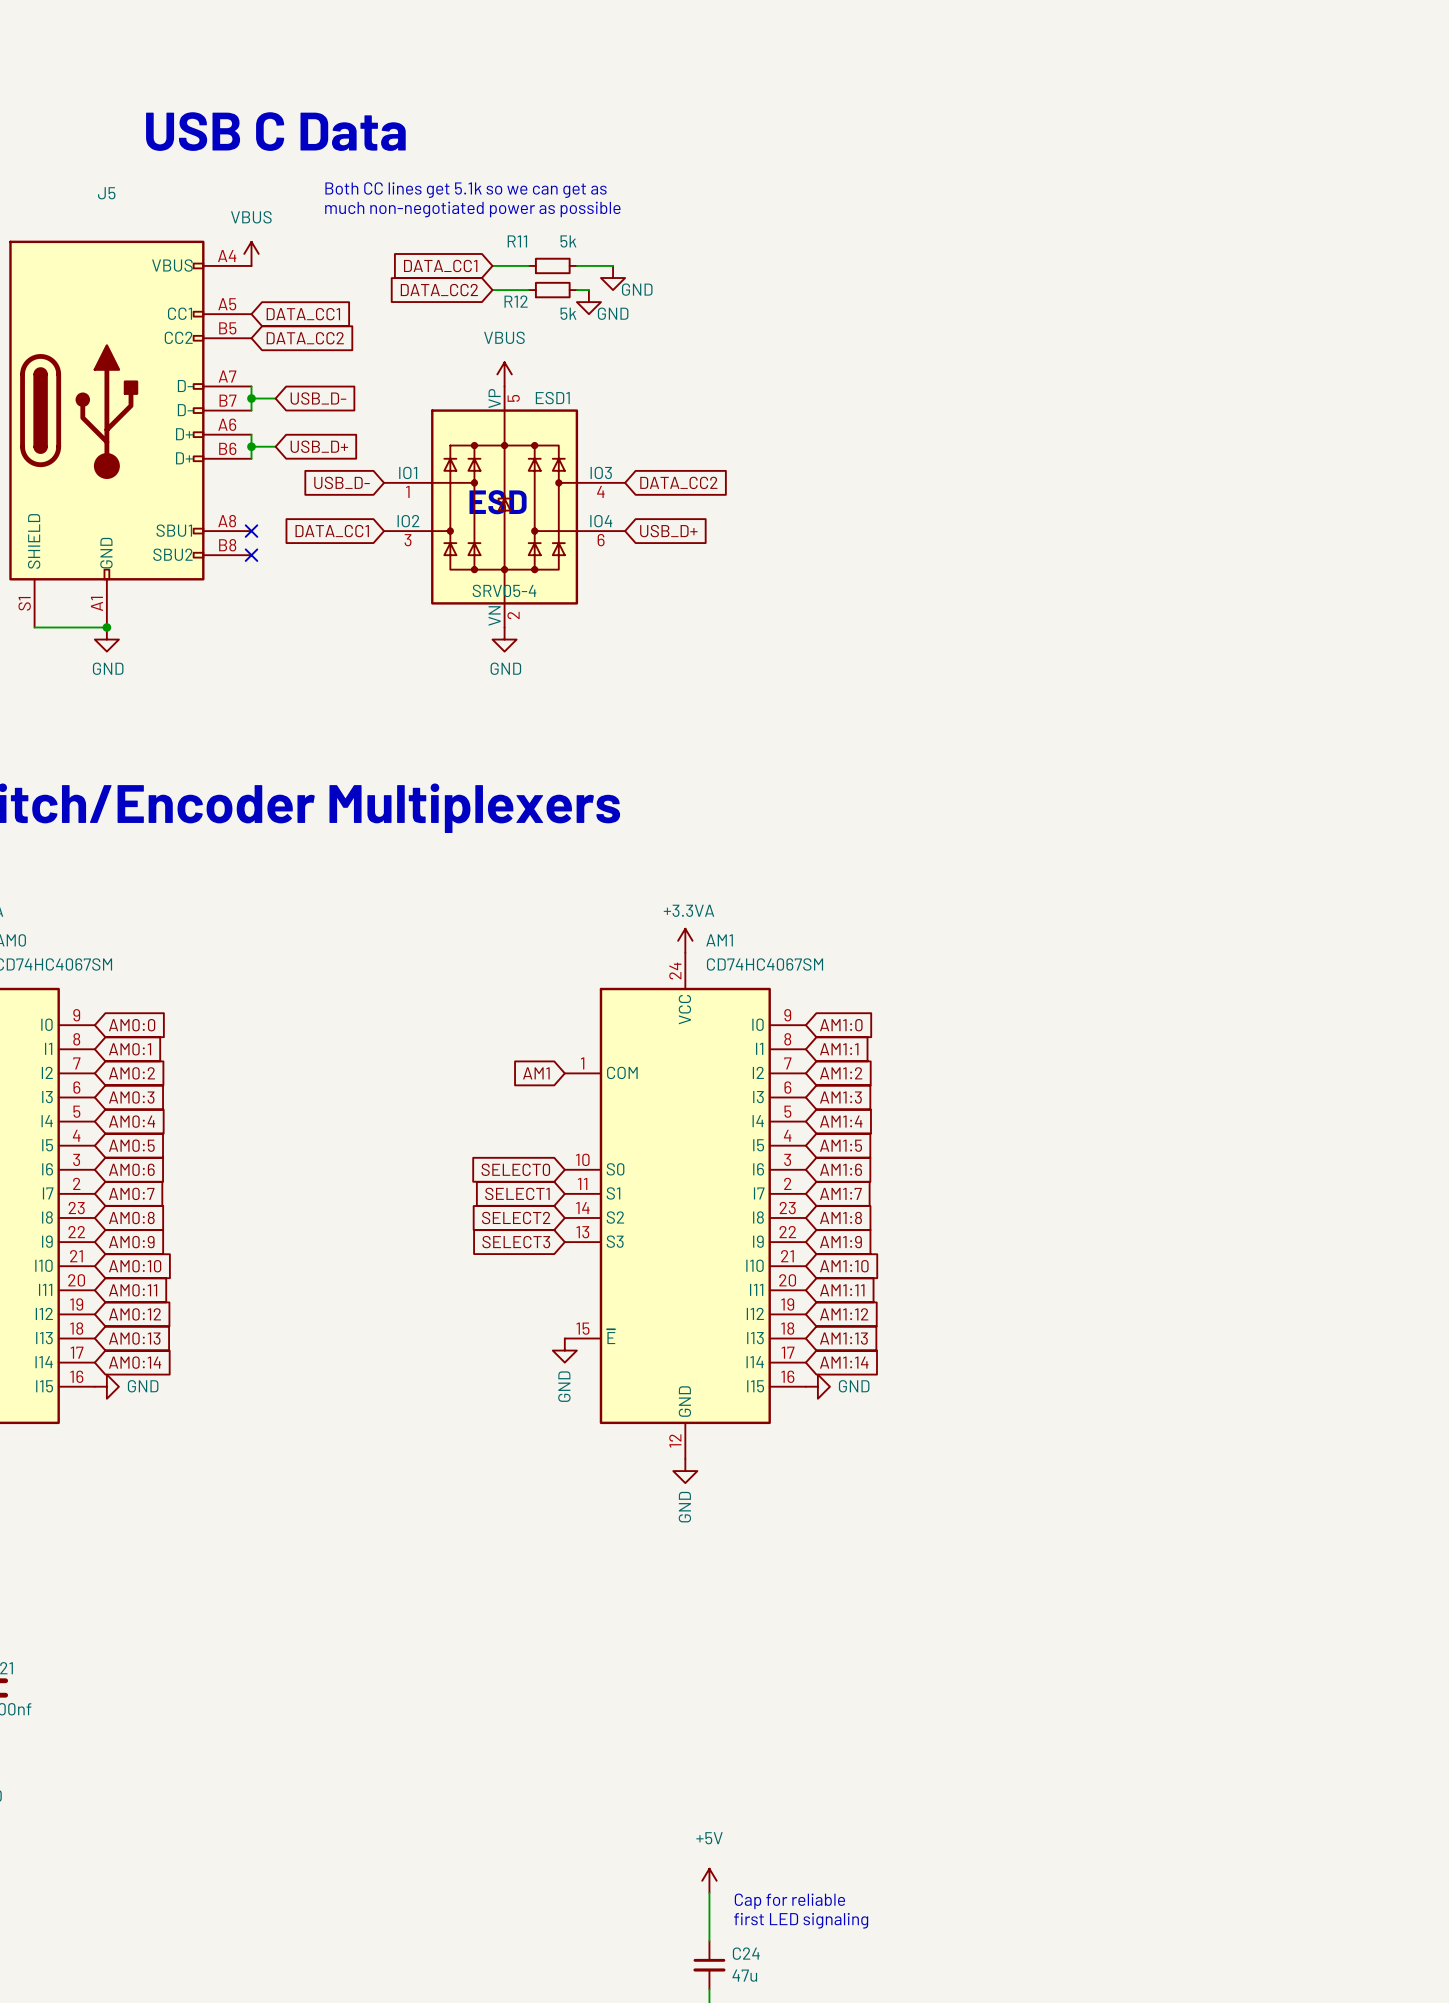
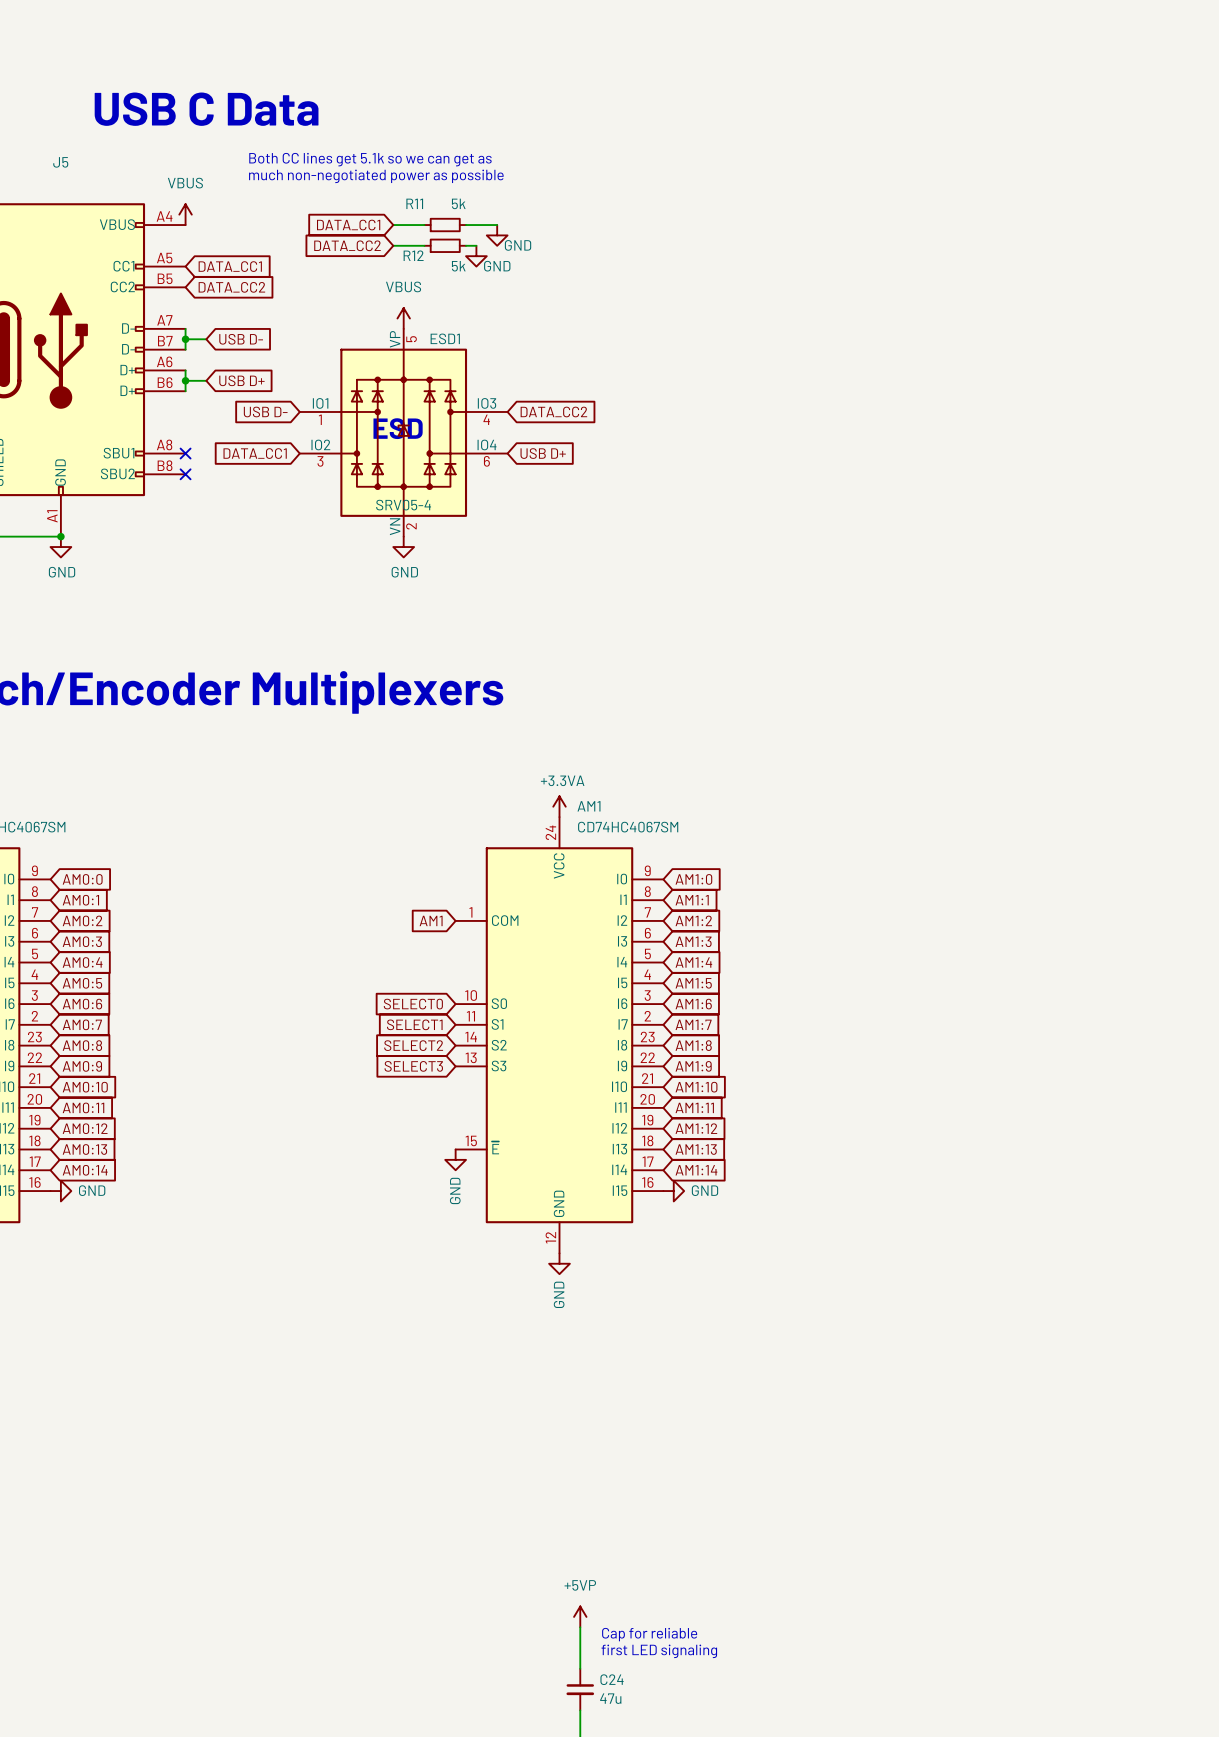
global label: USB_D- (318, 398) -> USB D- (241, 339)
global label: USB_D+ (319, 446) -> USB D+ (241, 380)
global label: USB_D- (342, 482) -> USB D- (265, 411)
global label: USB_D+ (668, 531) -> USB D+ (543, 453)
power symbol: +5V (709, 1880) -> +5VP (580, 1616)

